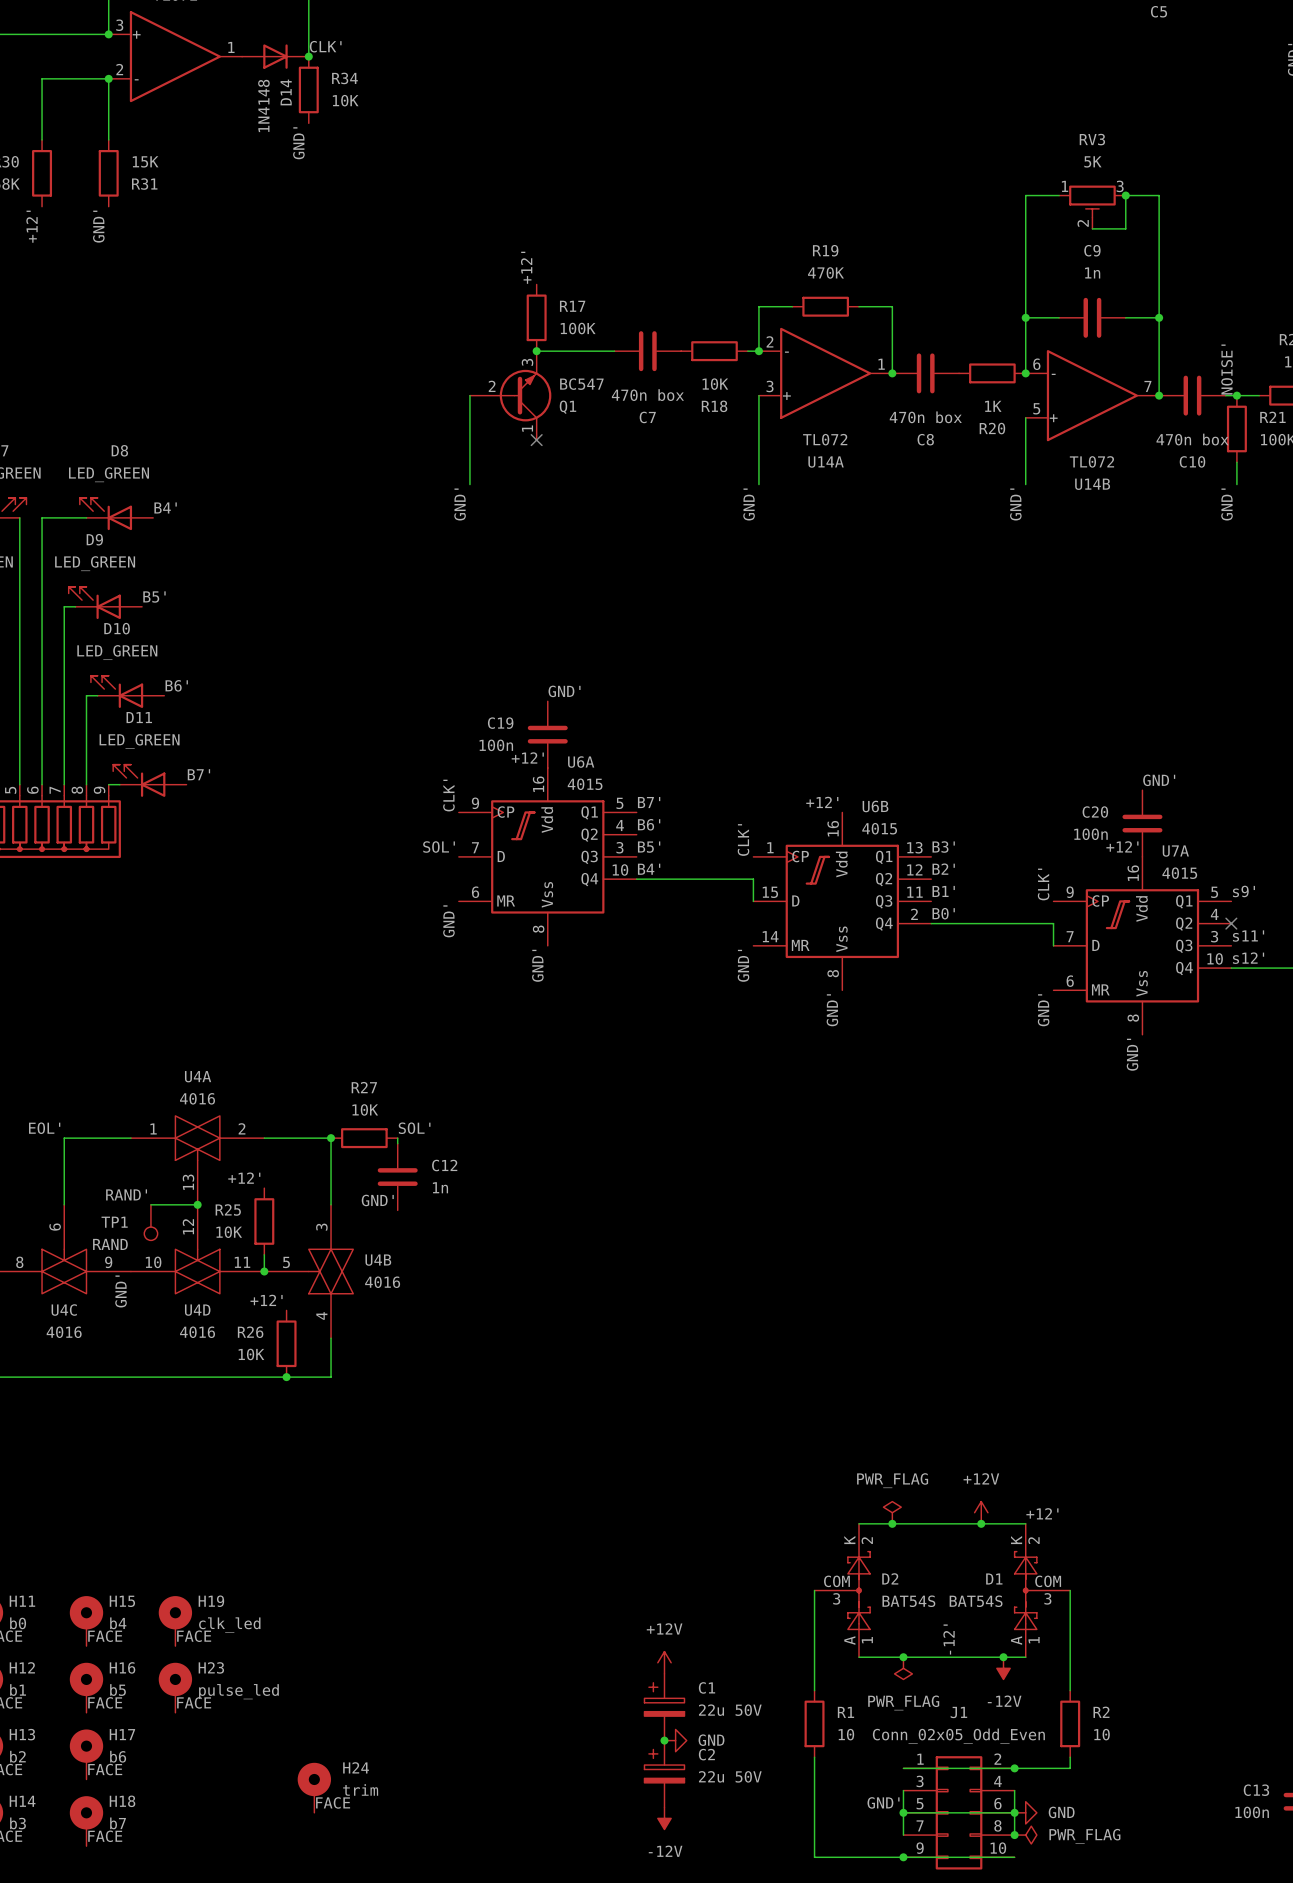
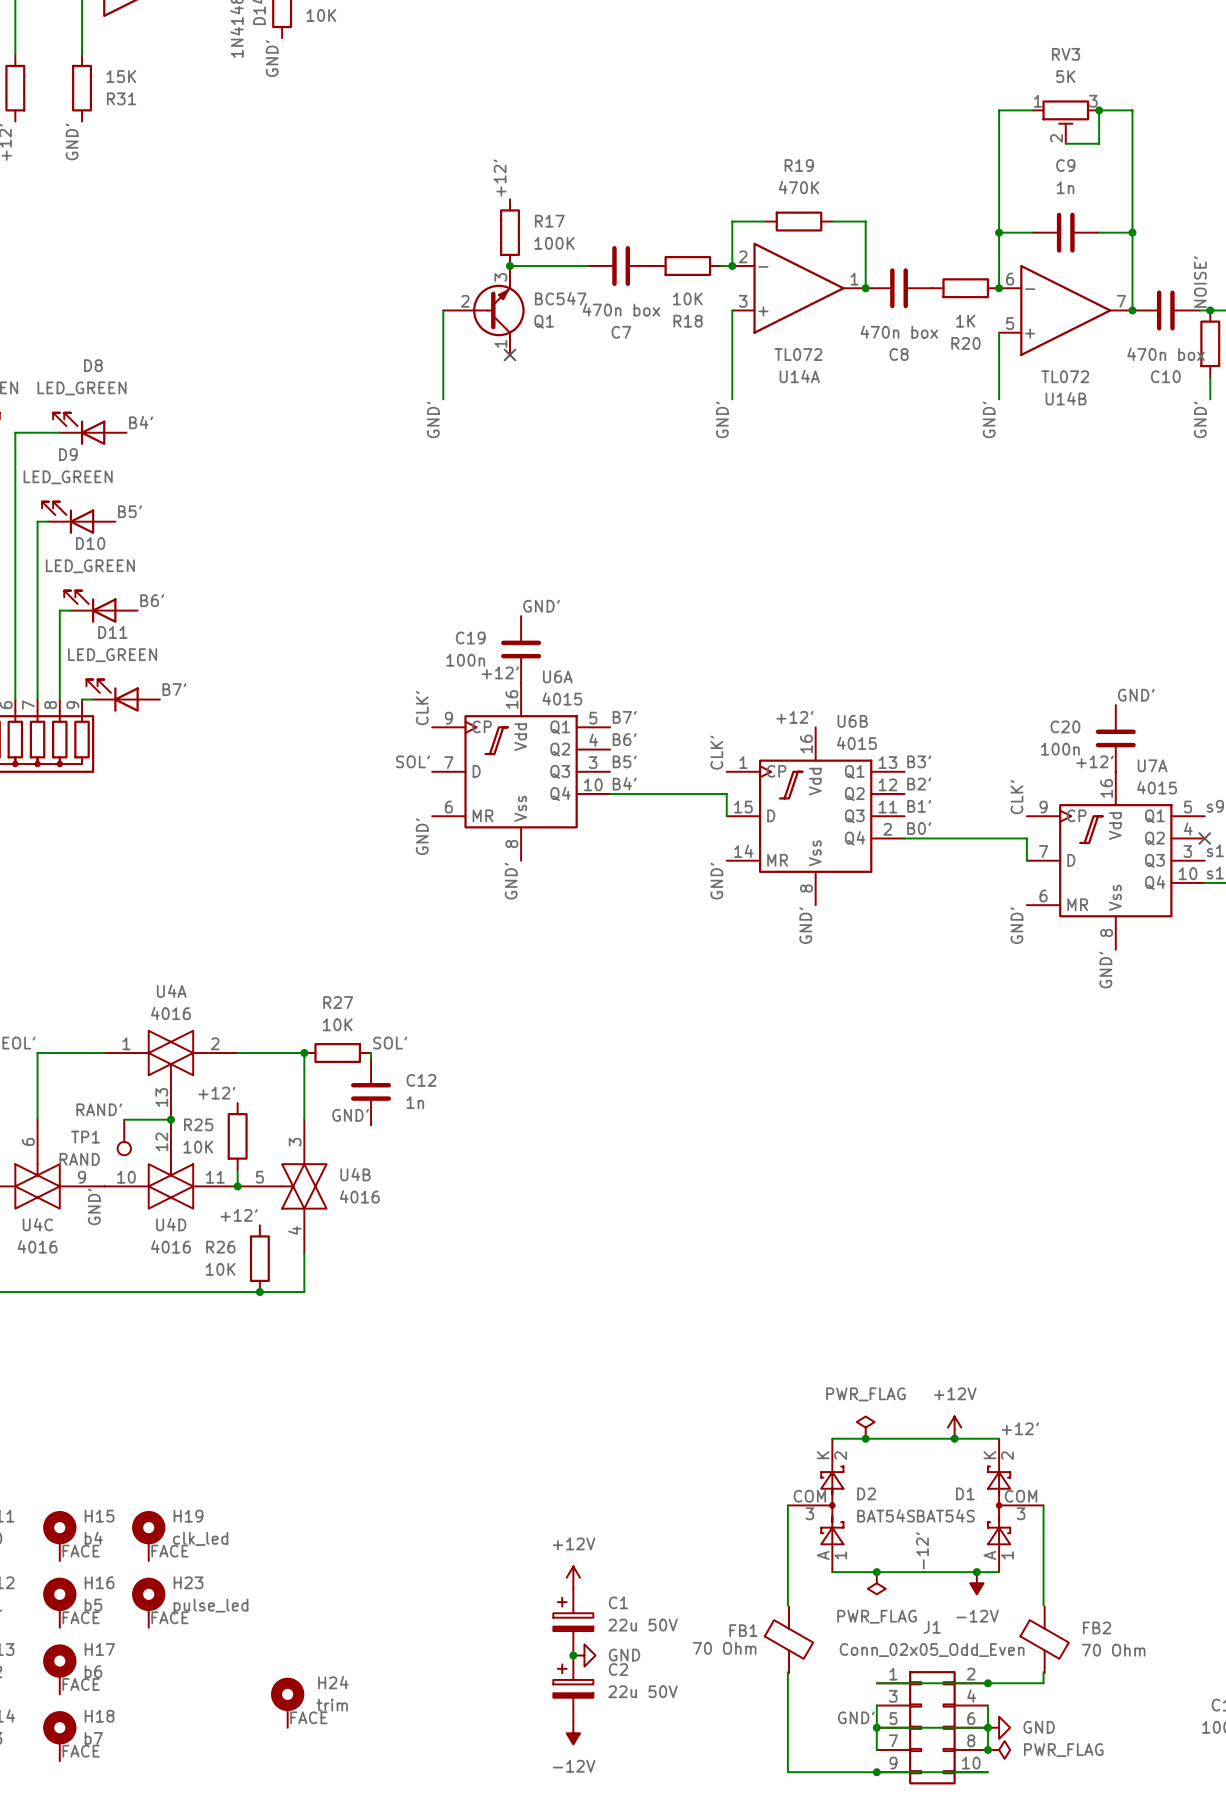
power symbol position: +12V (664, 1662) -> +12V (573, 1577)
C1 position: (664, 1707) -> (573, 1622)
R1: 10 (814, 1723) -> none
R2: 10 (1070, 1723) -> none
FB1: none -> 70 Ohm (788, 1639)
FB2: none -> 70 Ohm (1044, 1639)
junction: none -> (573, 1655)
junction: (664, 1740) -> none
power symbol position: GND (675, 1740) -> GND (584, 1655)
C2 position: (664, 1773) -> (573, 1688)
power symbol position: -12V (664, 1818) -> -12V (573, 1733)

